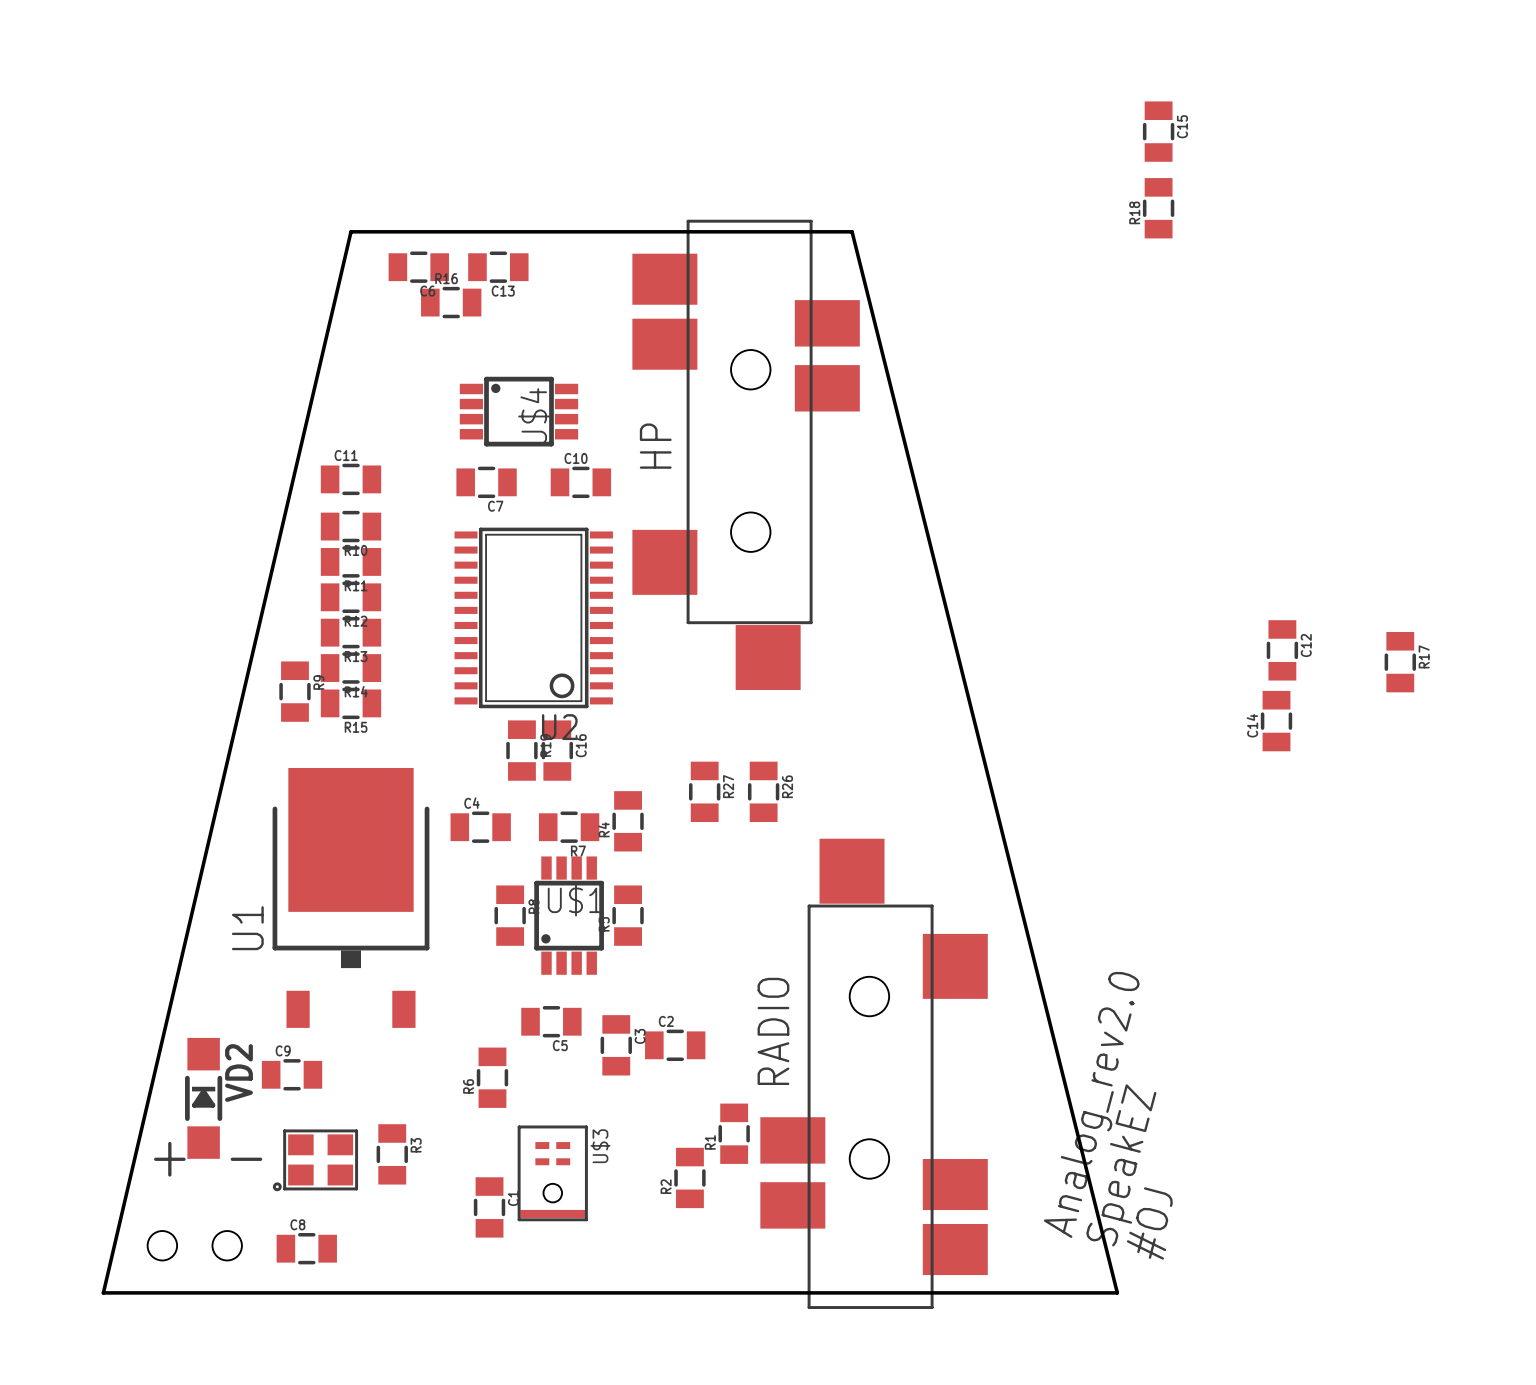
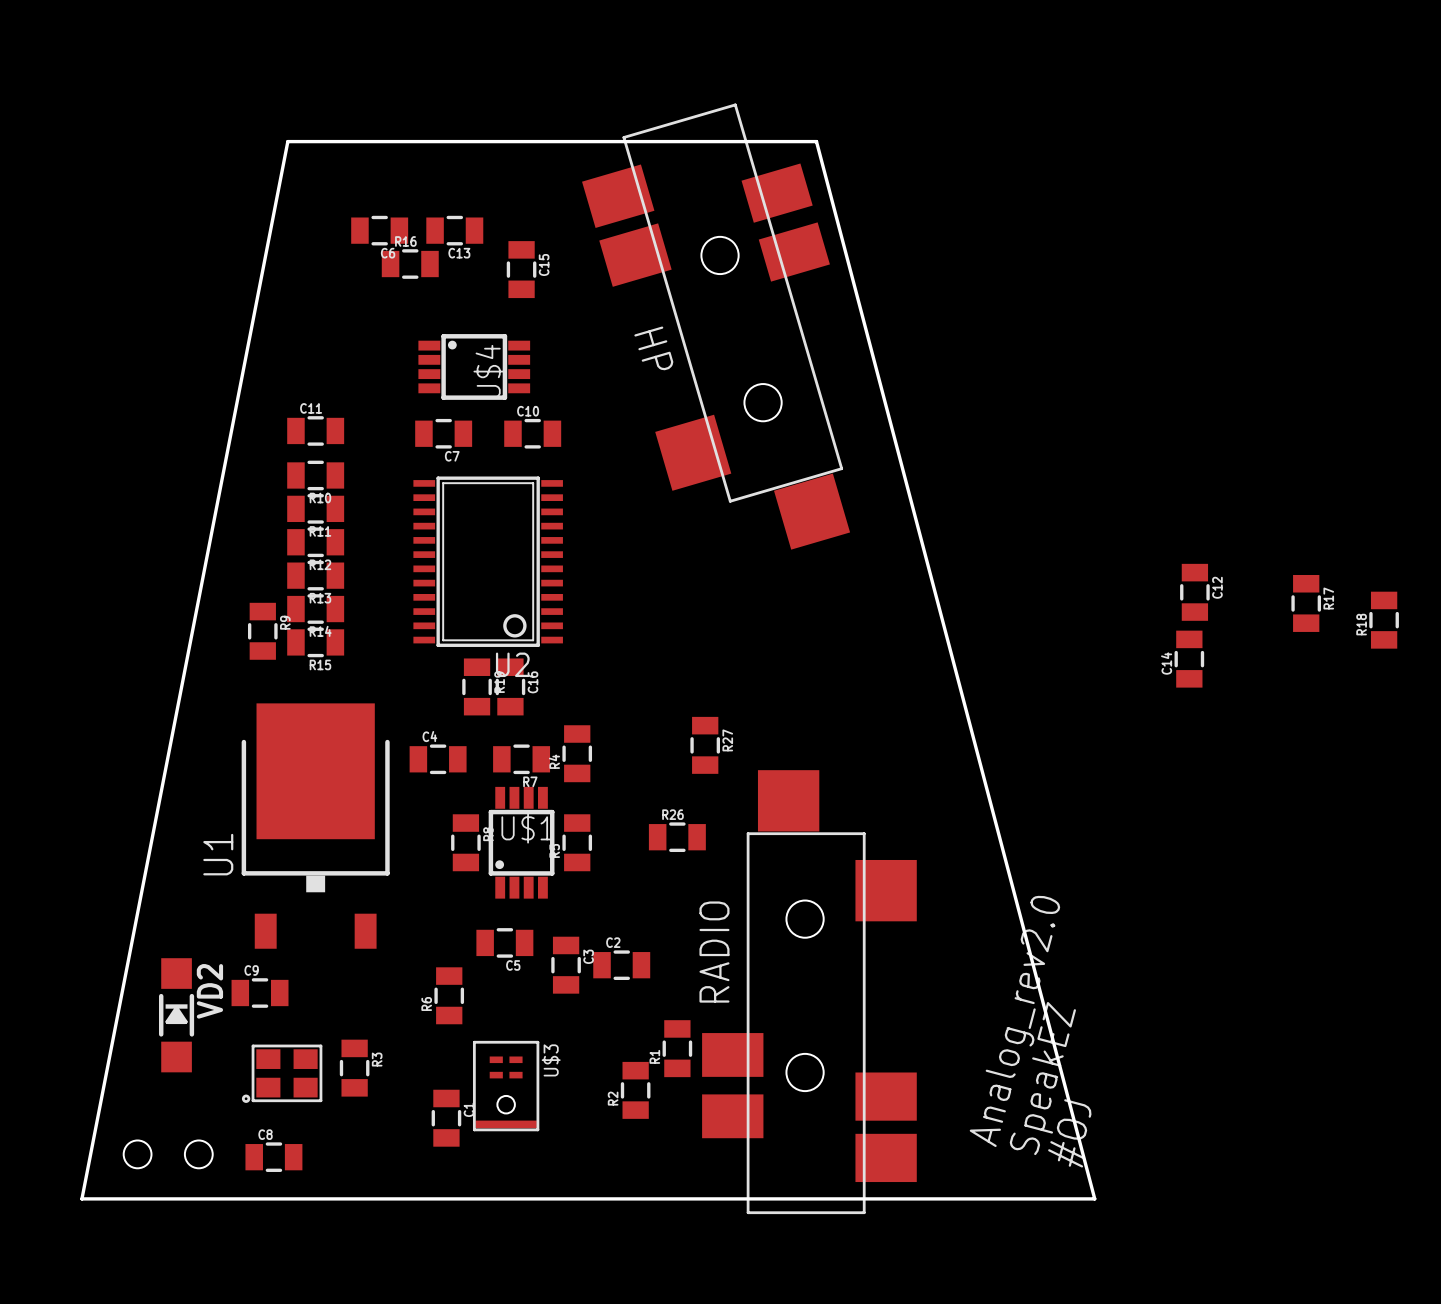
C15 position: (1158, 131) -> (521, 269)
R18 position: (1158, 208) -> (1384, 620)
HP: none -> (716, 326)
HP: (746, 454) -> none
R27 position: (704, 791) -> (705, 745)
R26 rotation: 0° (763, 791) -> 90° clockwise (677, 837)
R26 position: (763, 791) -> (677, 837)
text: + (169, 1159) -> none
text: - (246, 1159) -> none
board edge: (103, 1292) (350, 231) (852, 231) (1117, 1292) -> (81, 1198) (287, 141) (816, 141) (1094, 1198) (1039, 1198)

